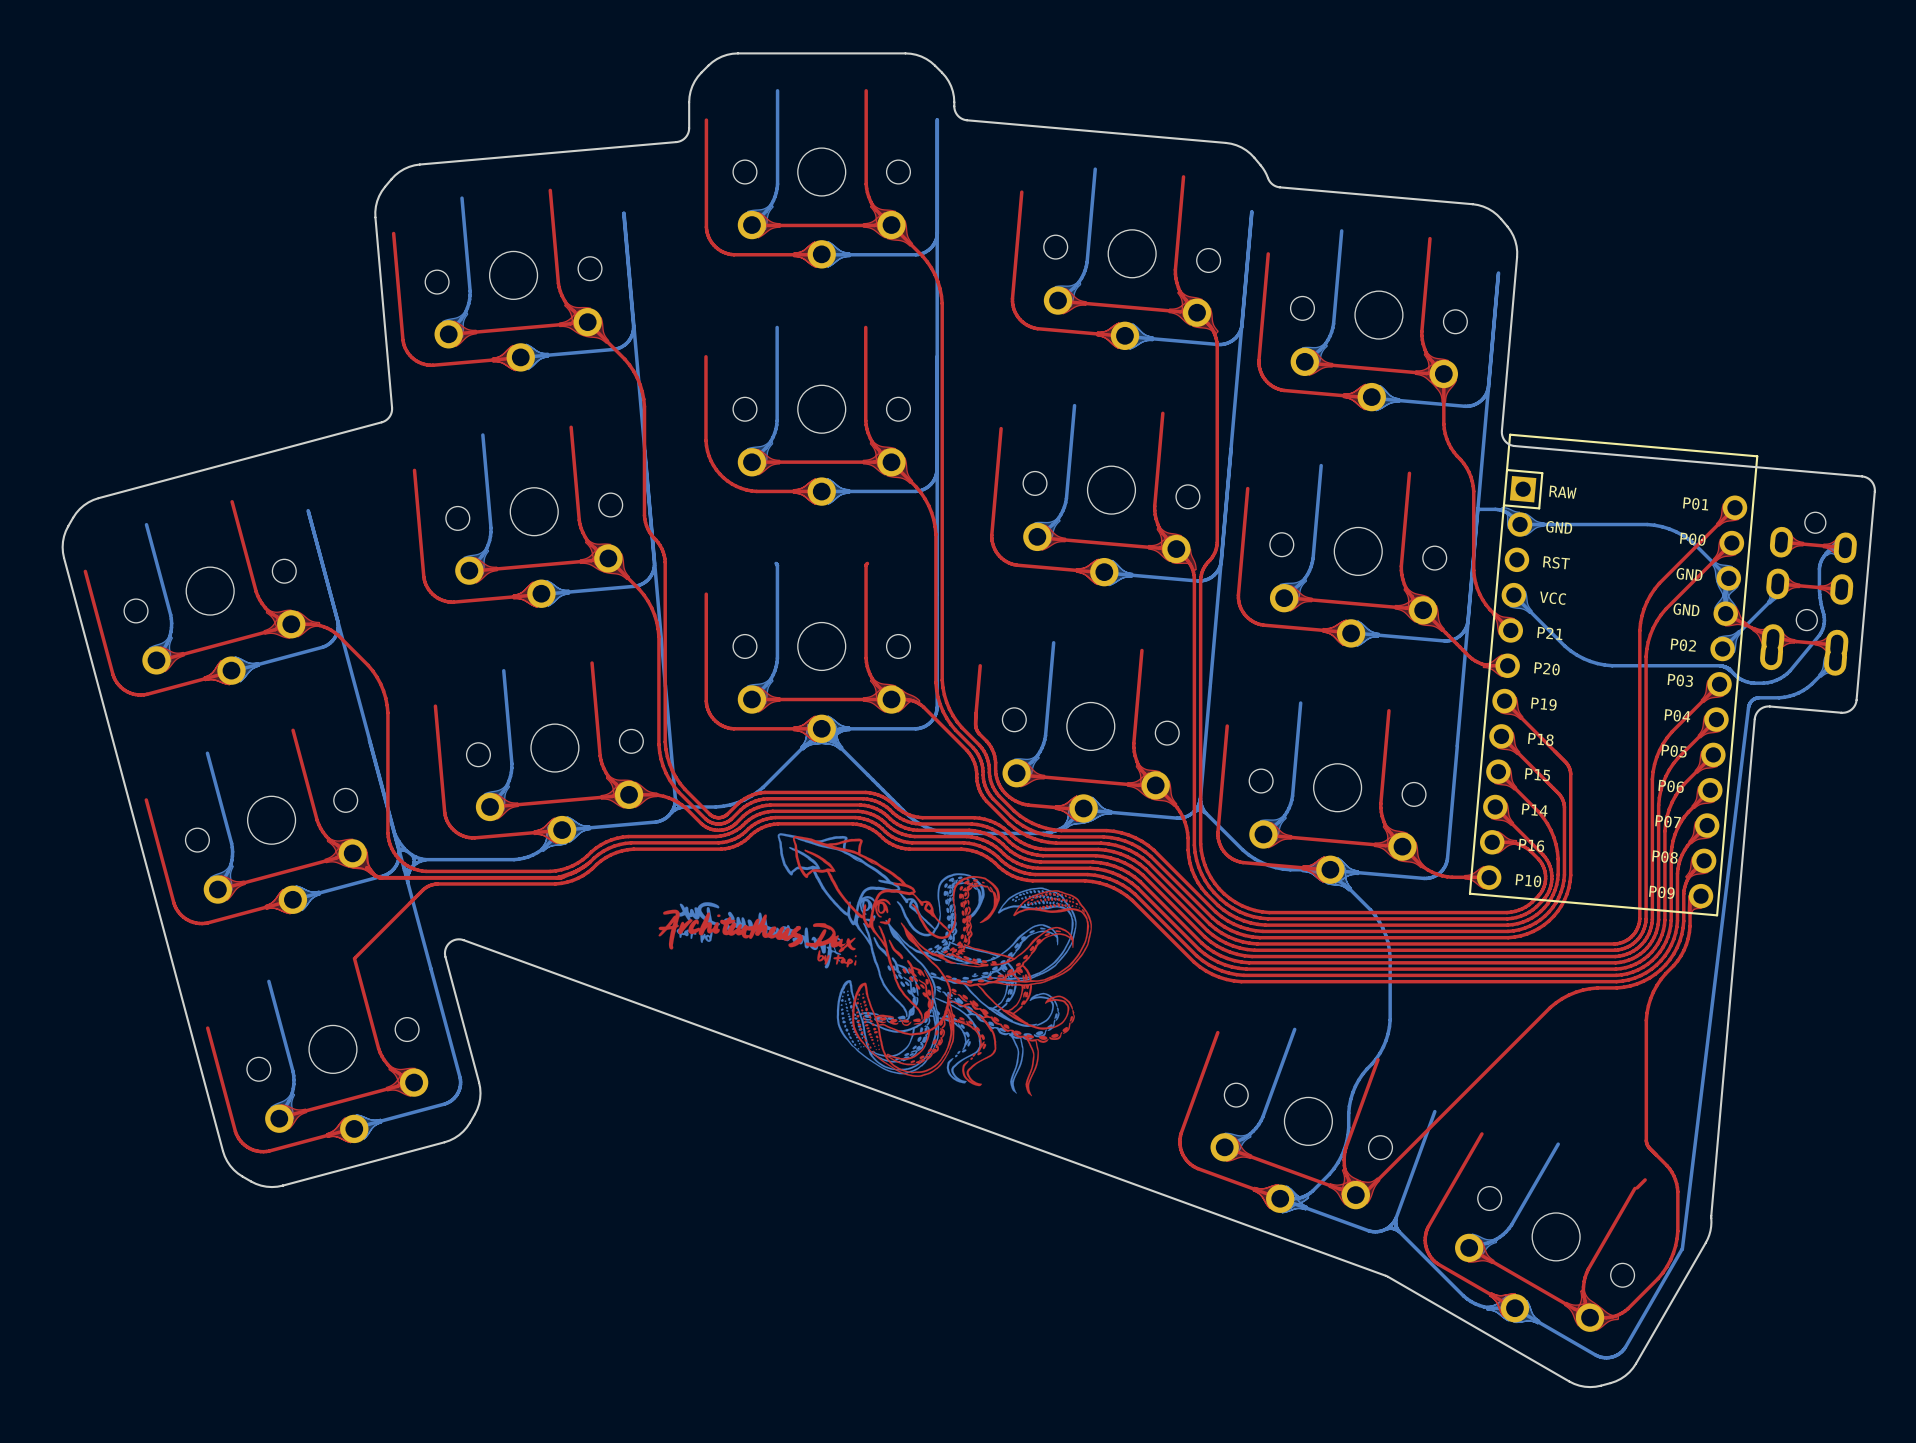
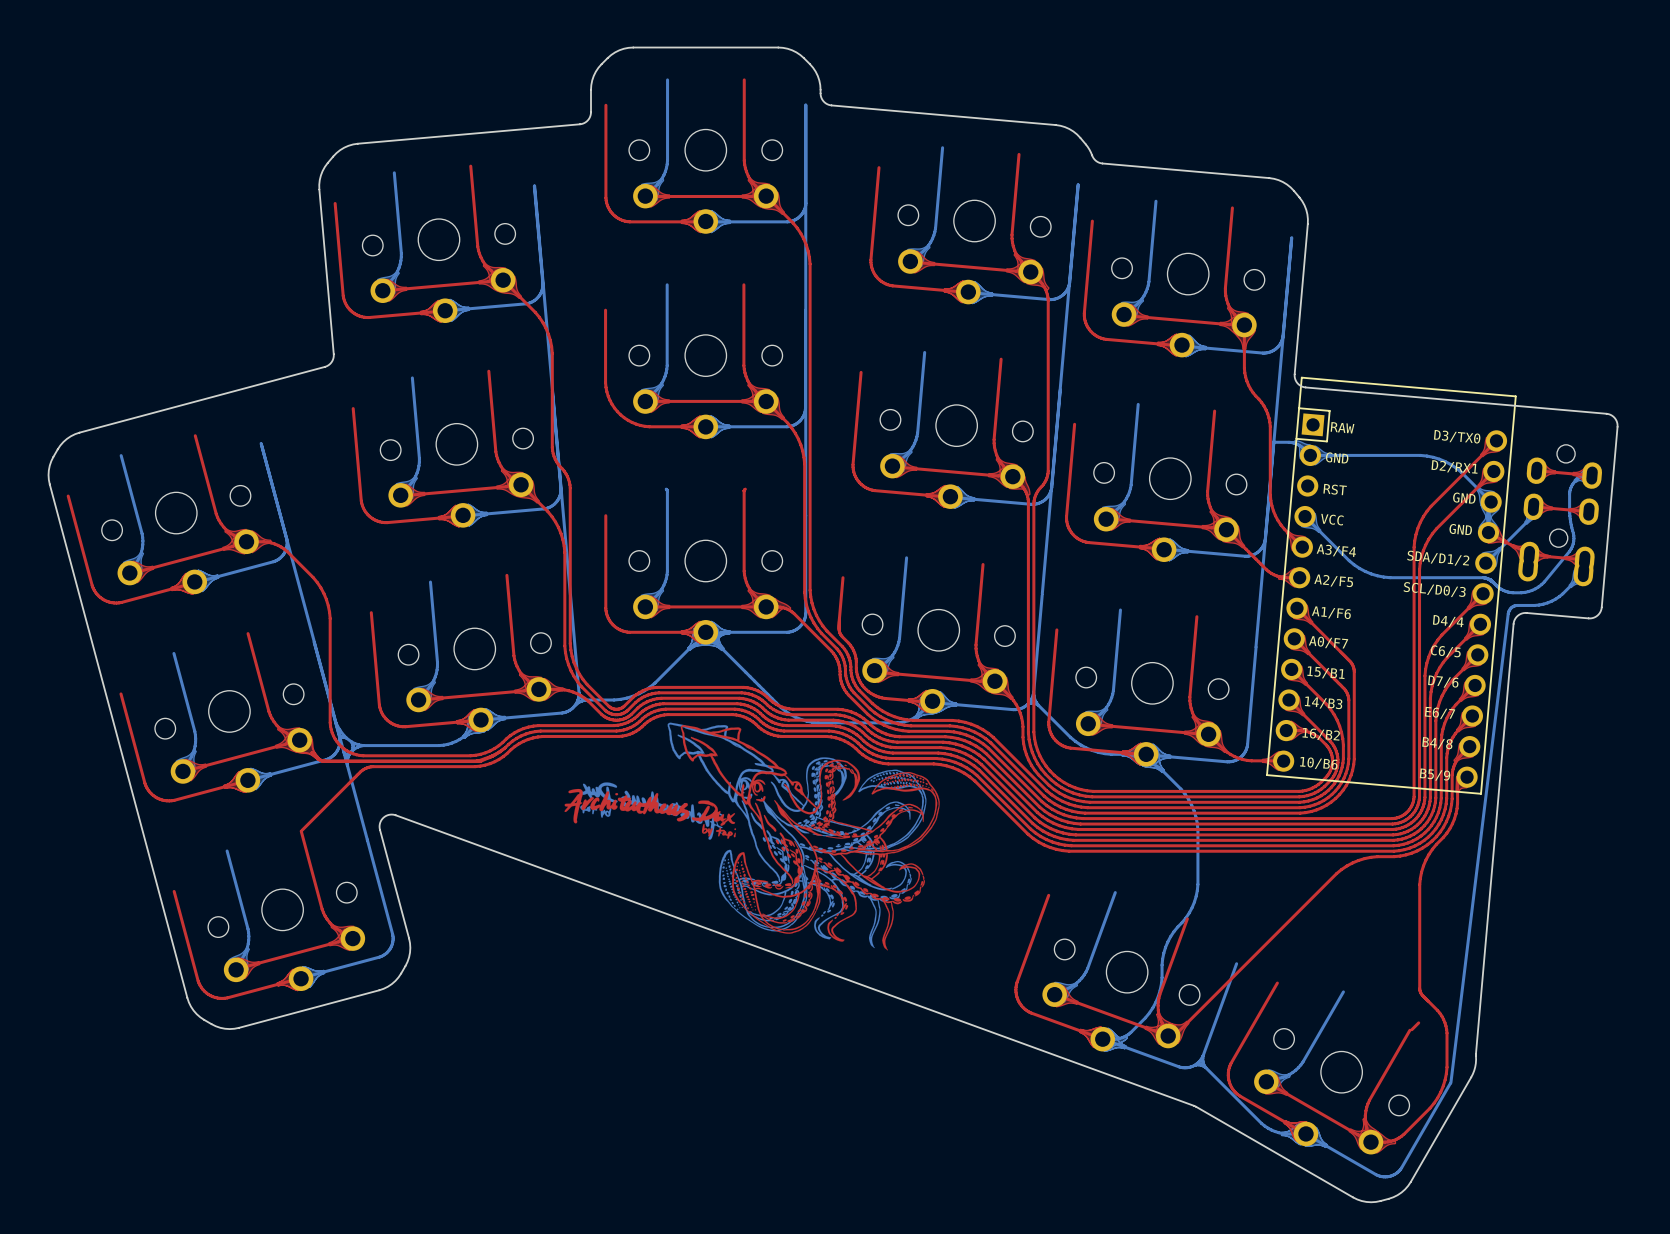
part footprint: [1468, 433, 1759, 917] -> [1266, 376, 1517, 795]

